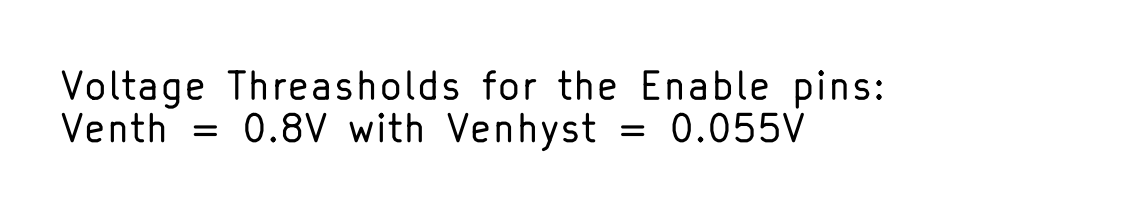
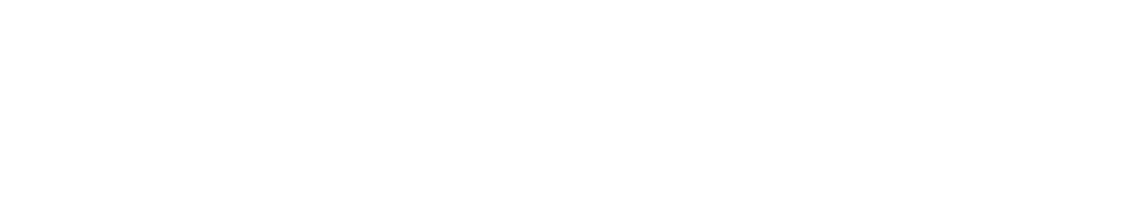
text: Voltage Threasholds for the Enable pins: (471, 89) -> none
text: Venth = 0.8V with Venhyst = 0.055V (432, 131) -> none

